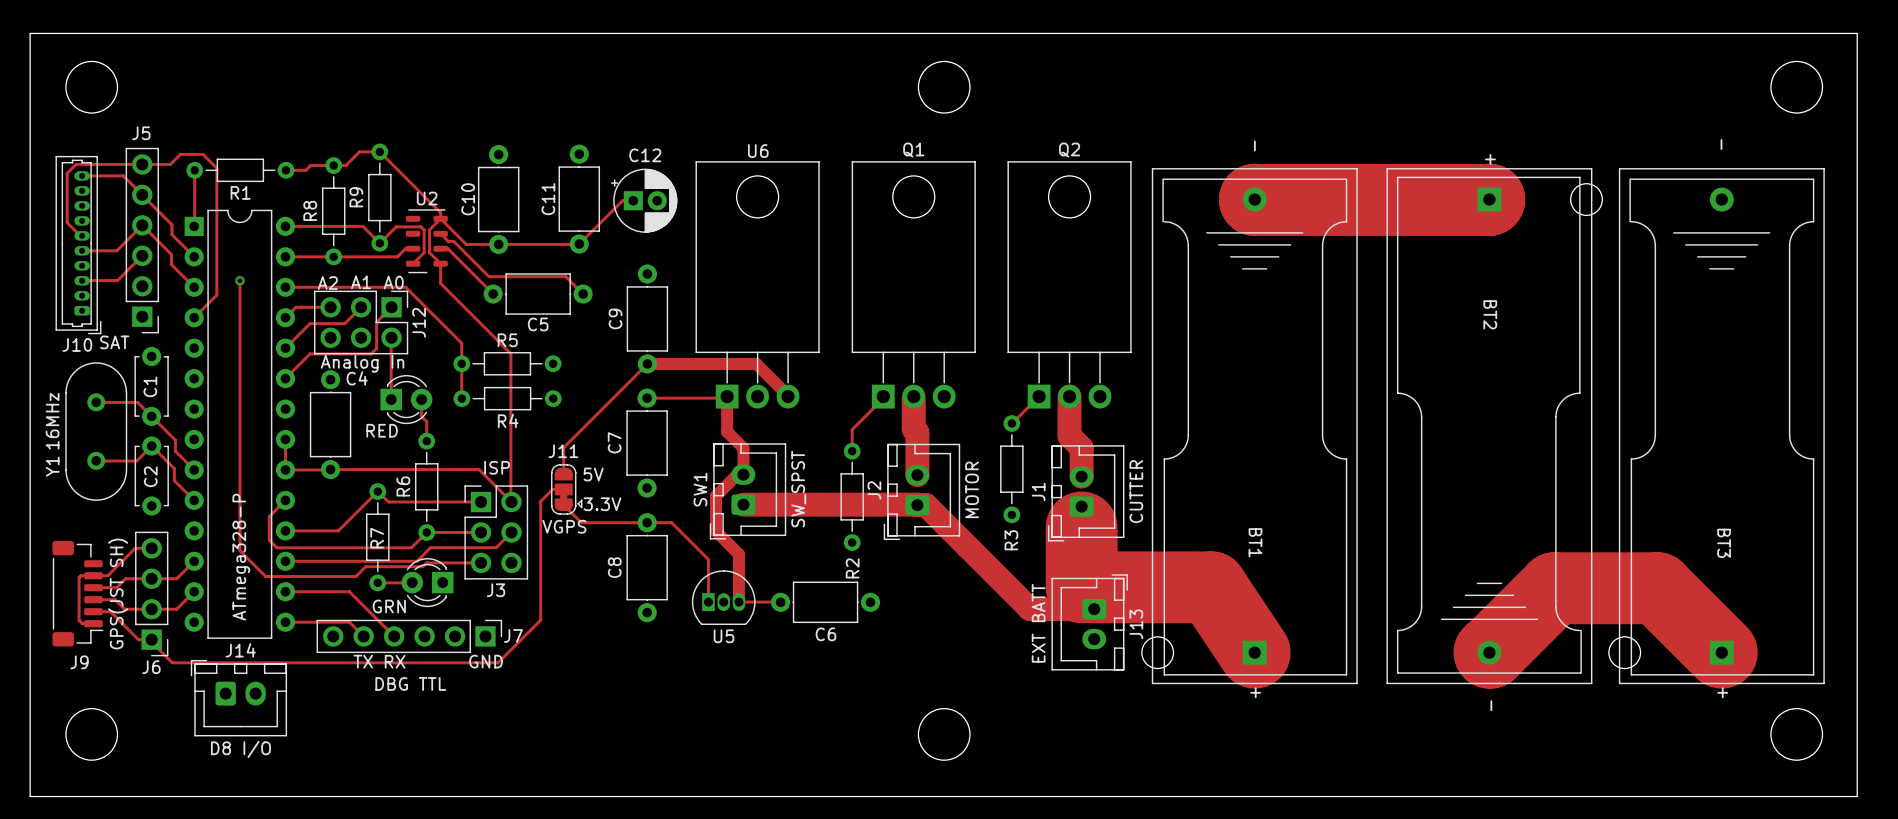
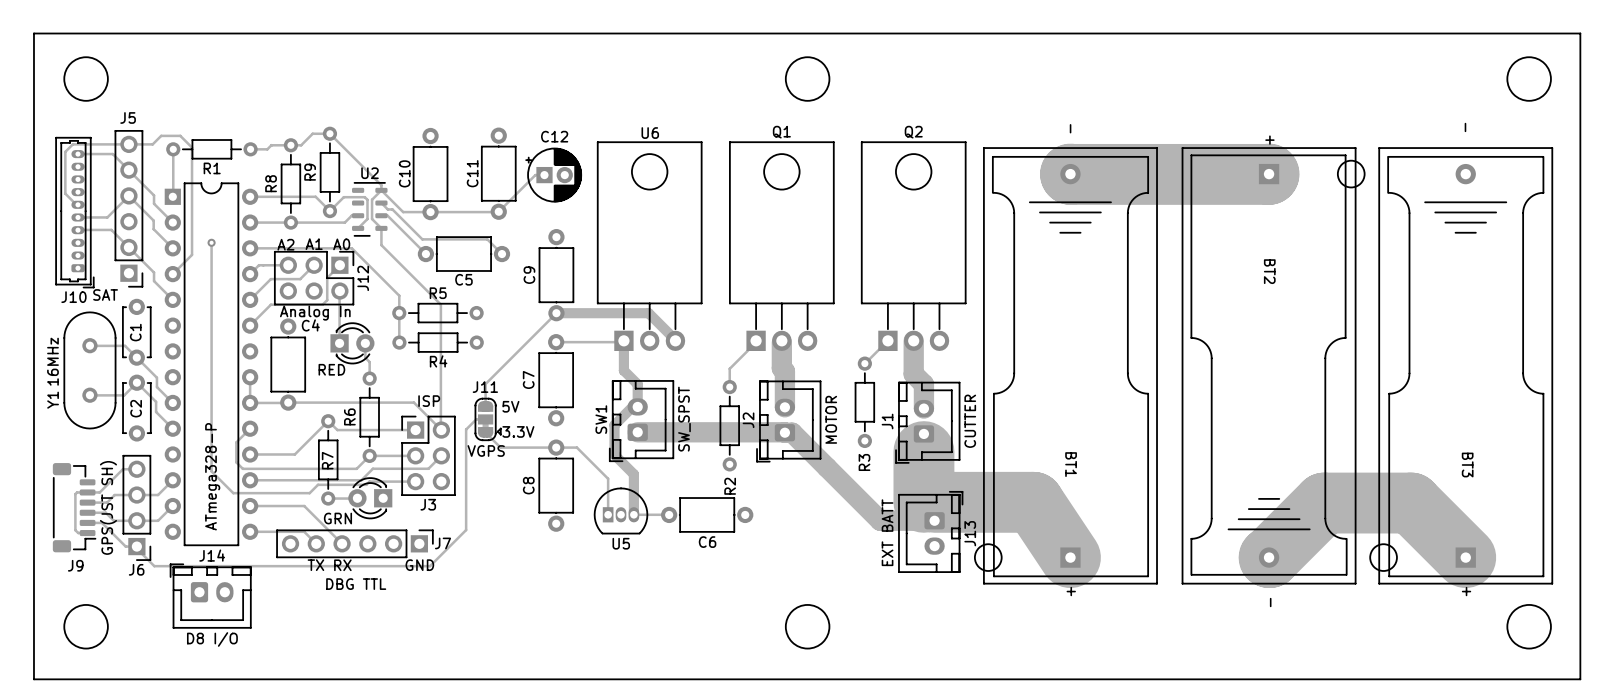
track: (142, 255) (117, 280) (81, 280) -> none
track: none -> (77, 229) (111, 229) (154, 272) (154, 281) (172, 299)

